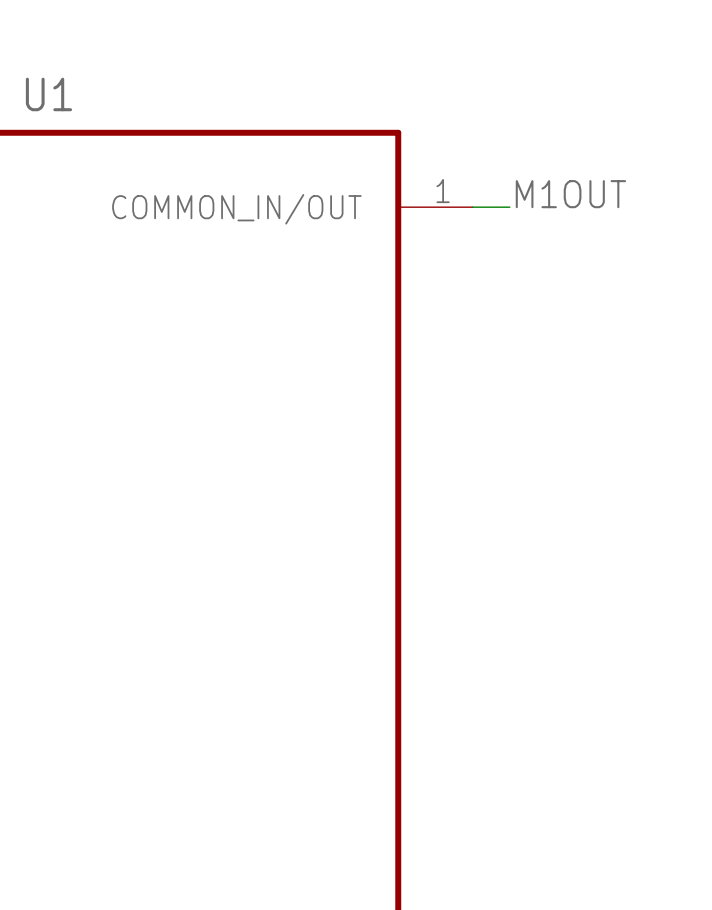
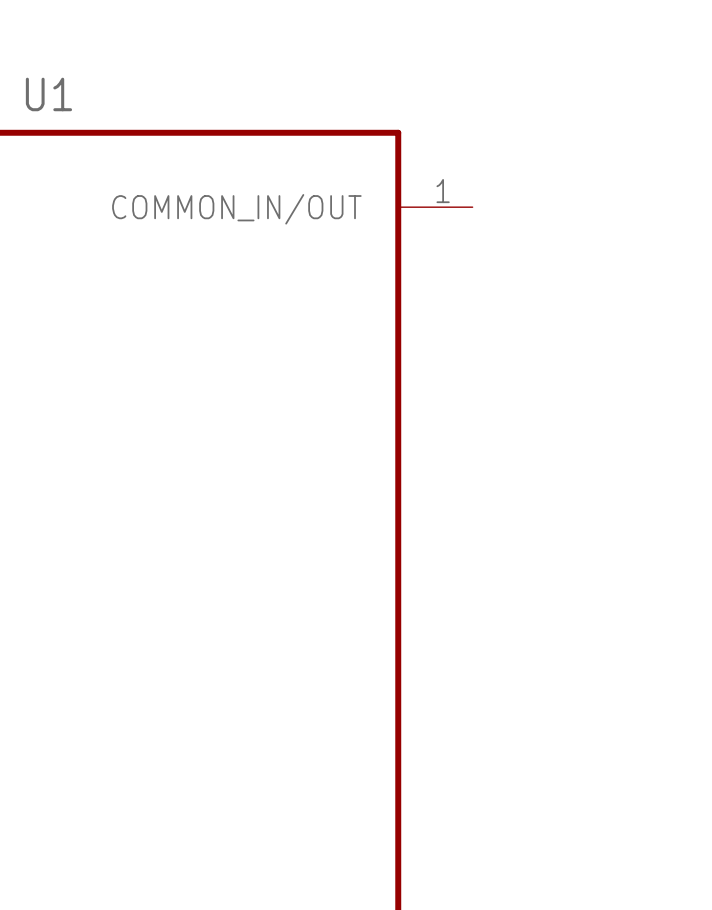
label: M1OUT (570, 194) -> none
wire: (472, 207) (509, 207) -> none

